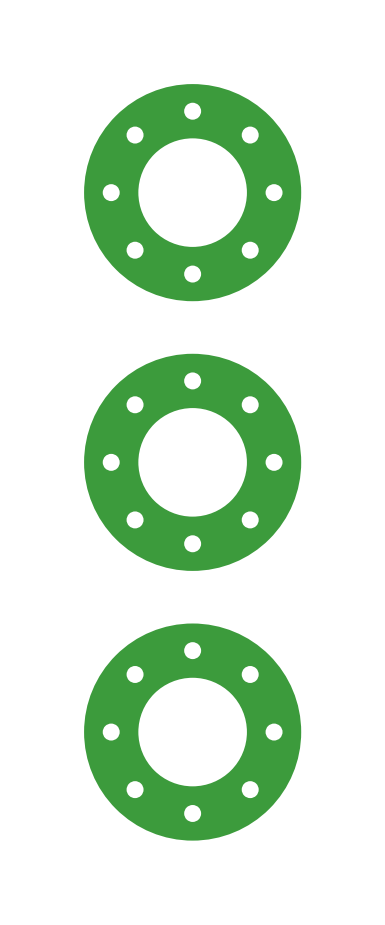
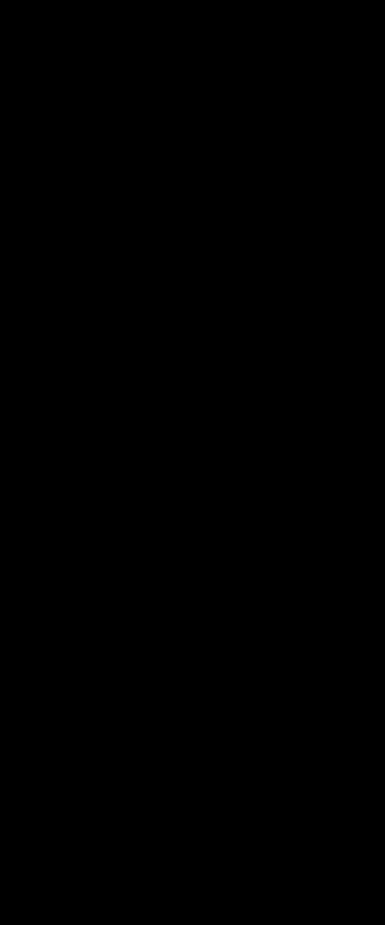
part: (192, 192) -> none
part: (192, 462) -> none
part: (192, 732) -> none

